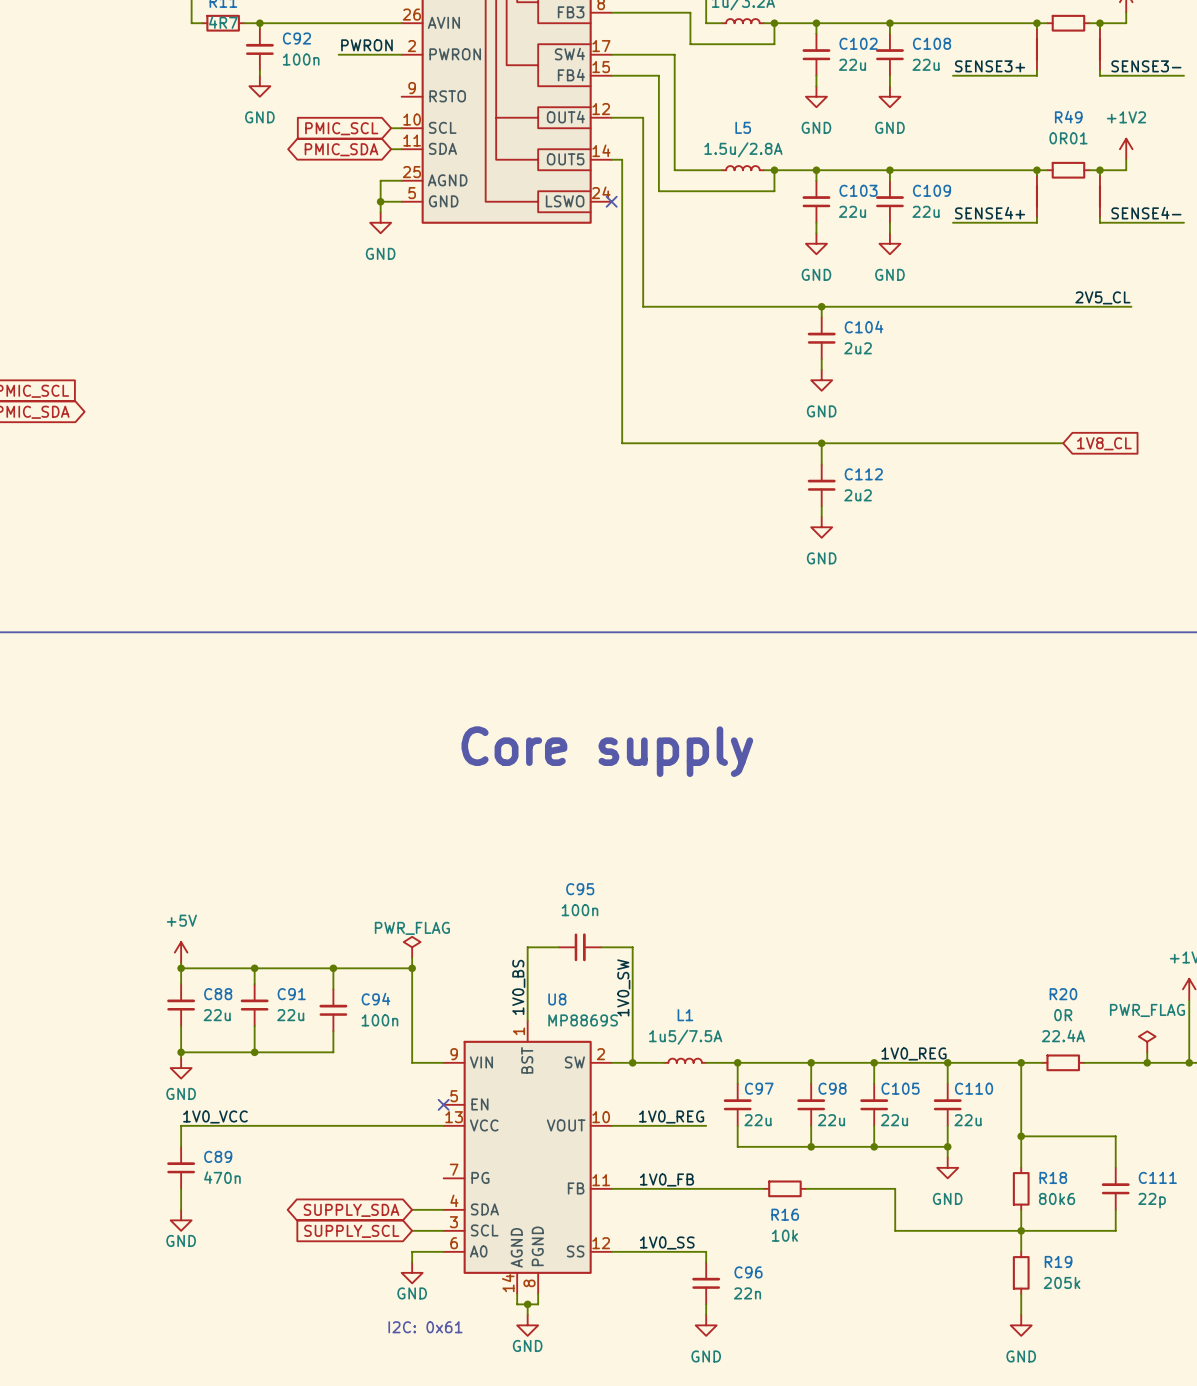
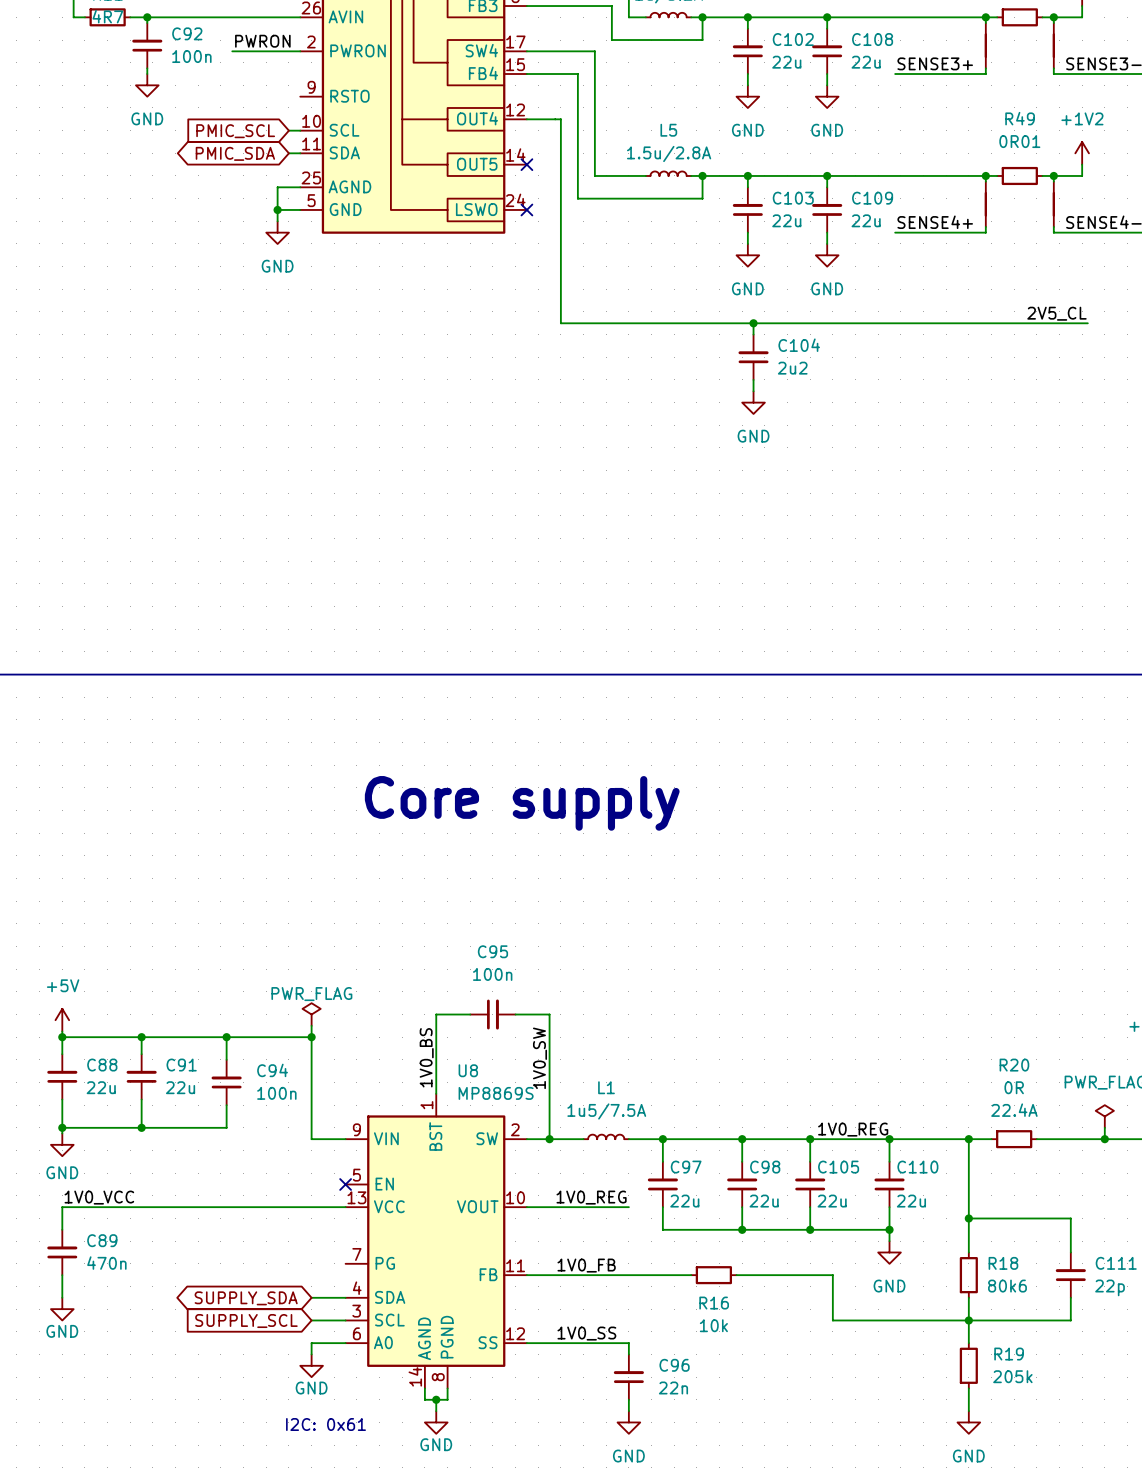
wire: (611, 159) (622, 159) (622, 443) (1063, 443) -> none
no-connect mark: none -> (526, 164)
wire: (821, 443) (821, 464) -> none
junction: (821, 443) -> none
global label: 1V8_CL (1104, 443) -> none
C112: (821, 485) -> none
wire: (821, 506) (821, 516) -> none
power symbol: GND (821, 527) -> none

